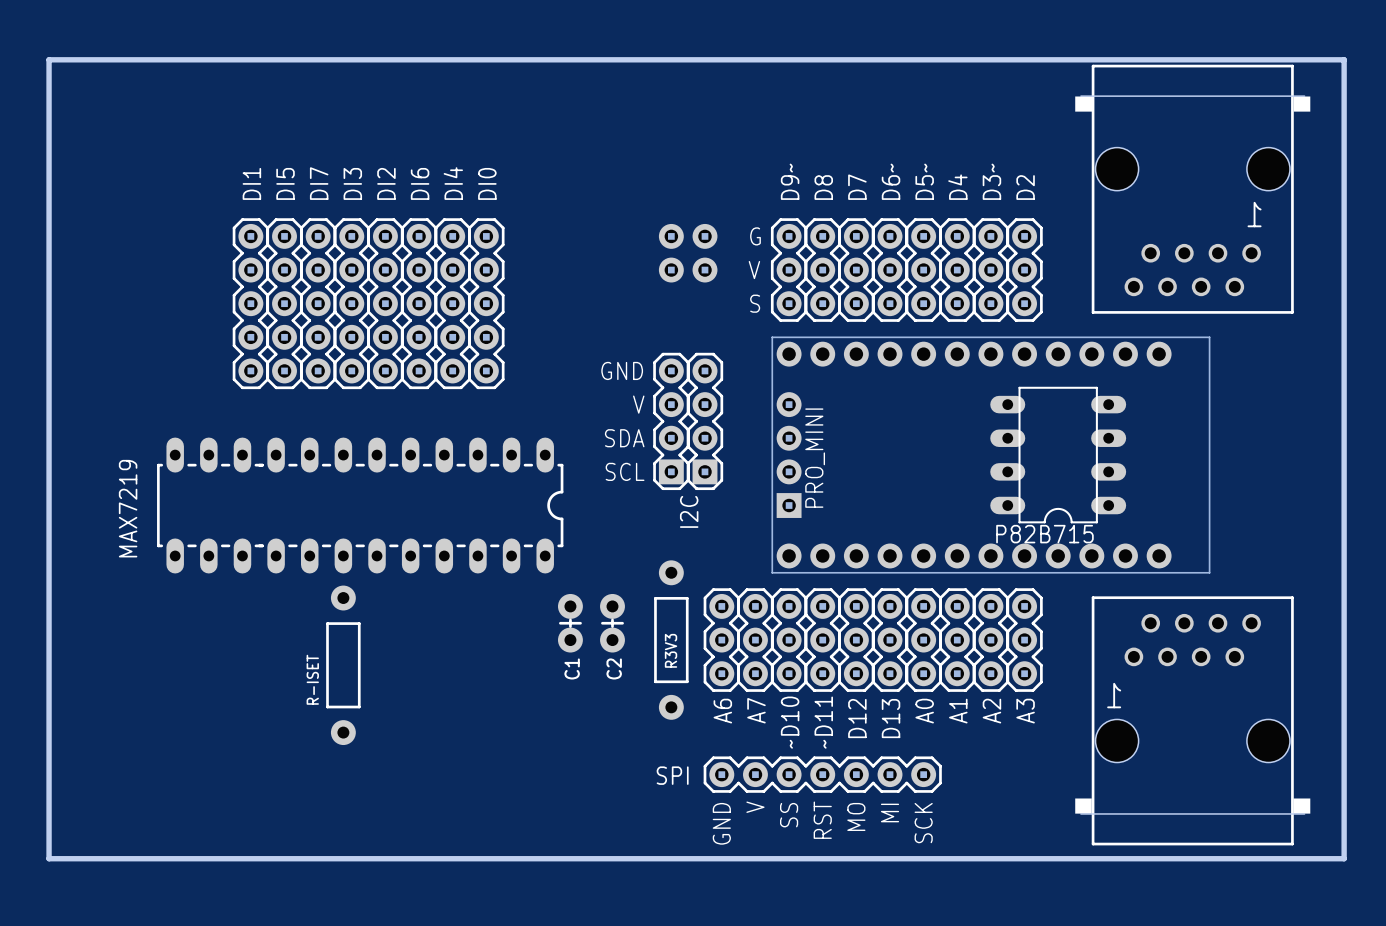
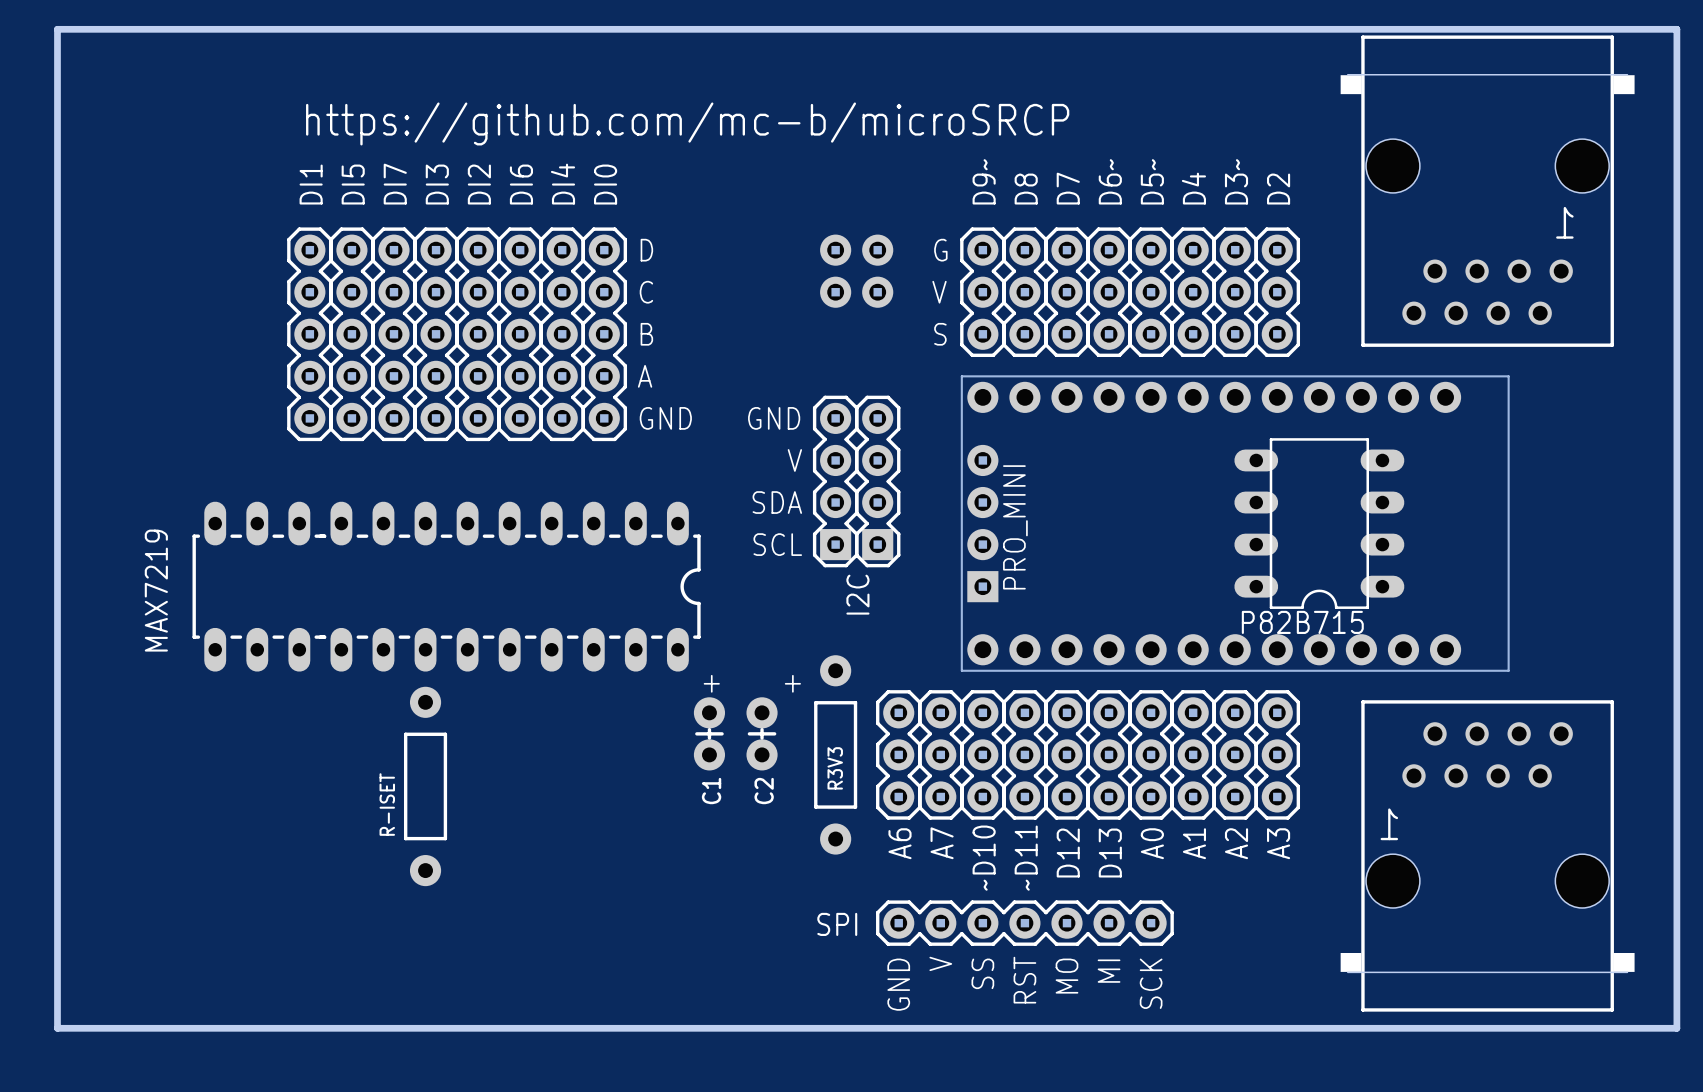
text: none -> https://github.com/mc-b/microSRCP (687, 123)
text: none -> D (646, 250)
text: none -> C (646, 292)
text: none -> B (646, 334)
text: none -> A (645, 376)
text: none -> GND (665, 418)
text: none -> + + (752, 683)

